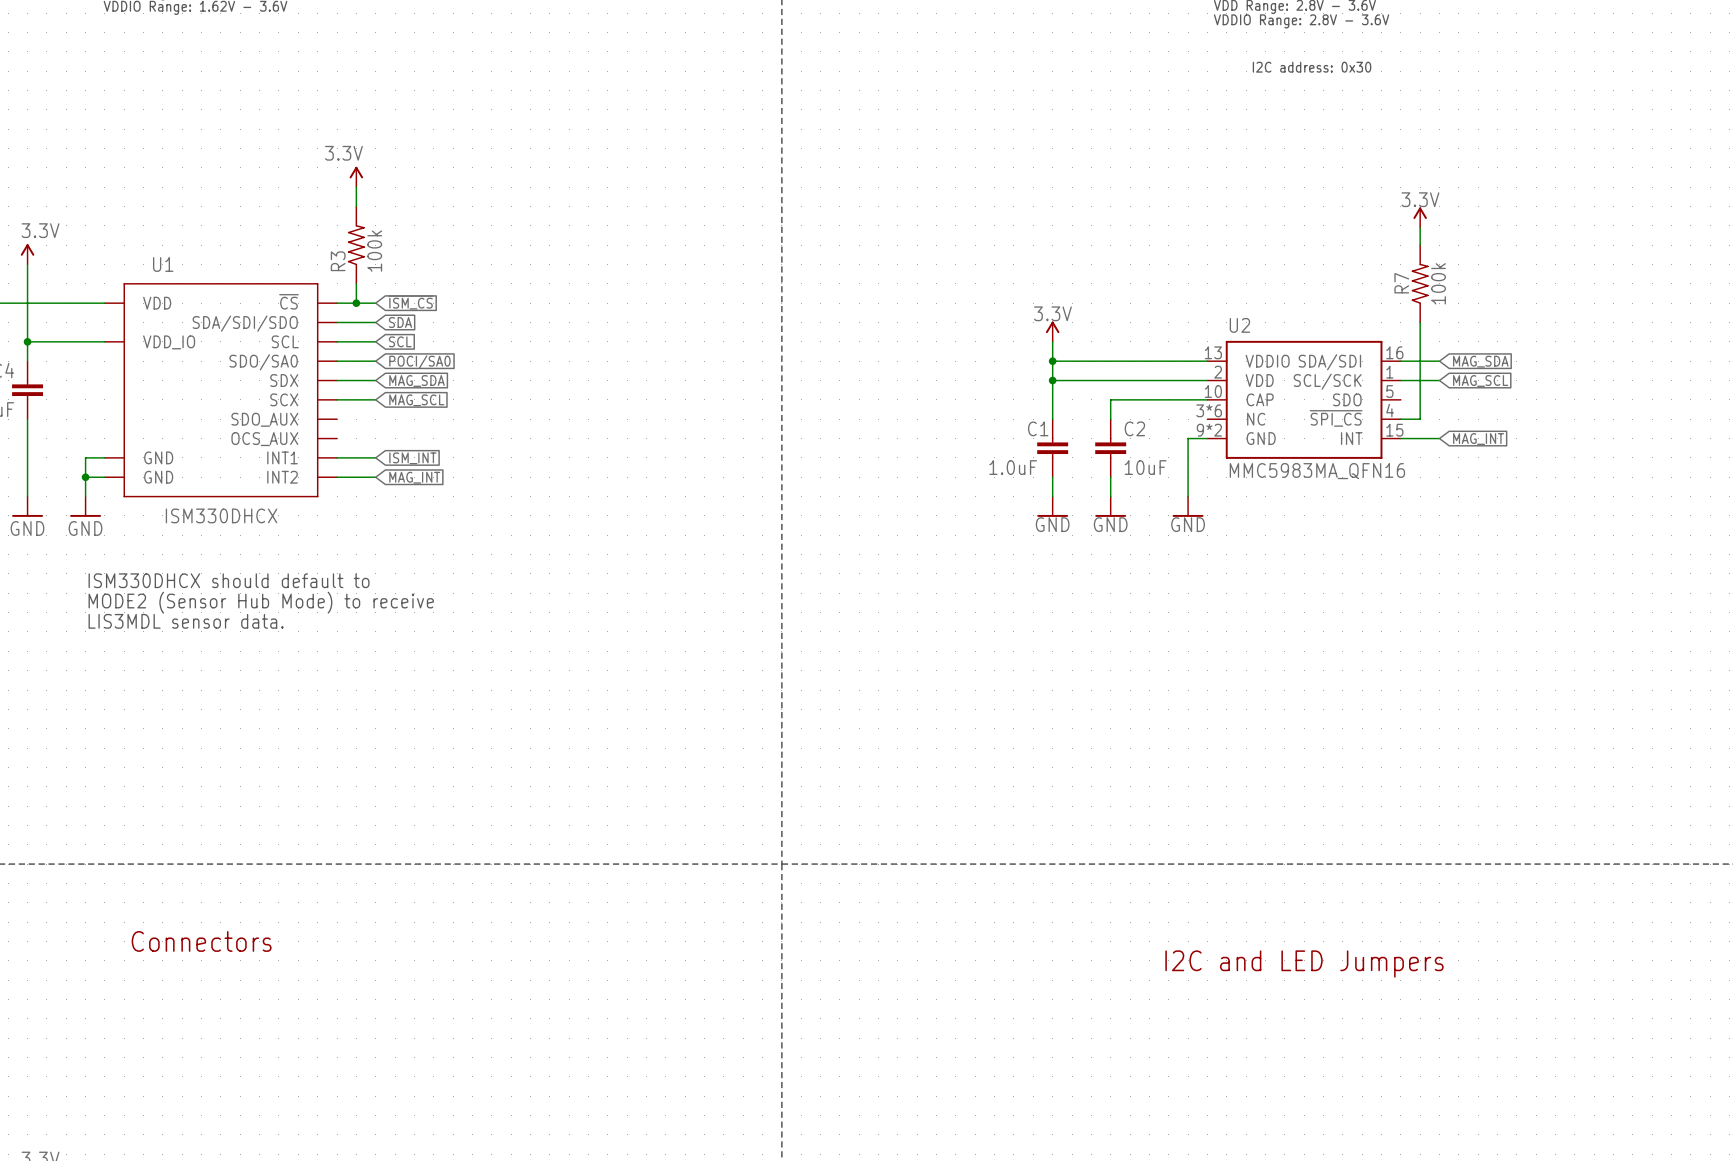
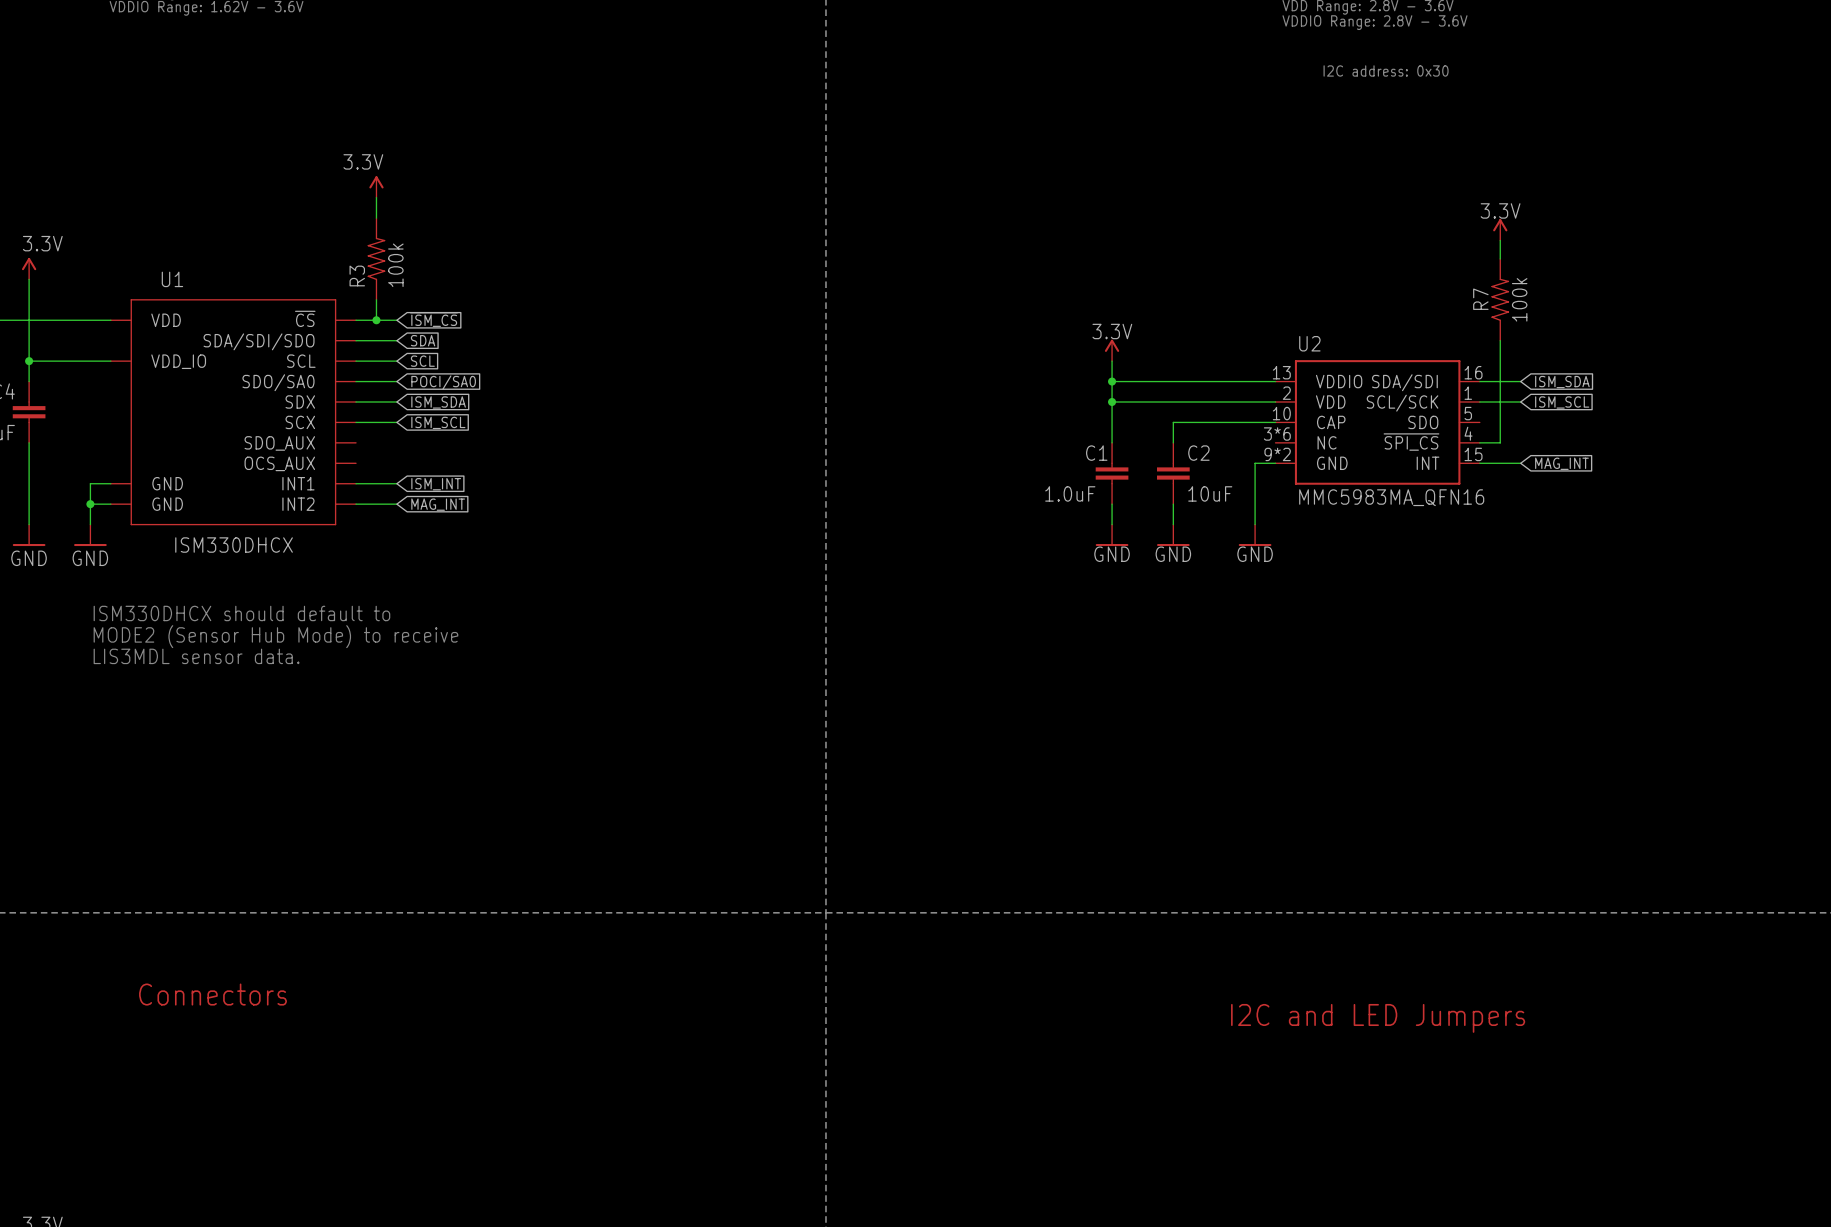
global label: MAG_SDA (1480, 361) -> ISM_SDA (1562, 382)
global label: MAG_SDA (417, 380) -> ISM_SDA (438, 402)
global label: MAG_SCL (1480, 380) -> ISM_SCL (1562, 402)
global label: MAG_SCL (416, 400) -> ISM_SCL (438, 422)

